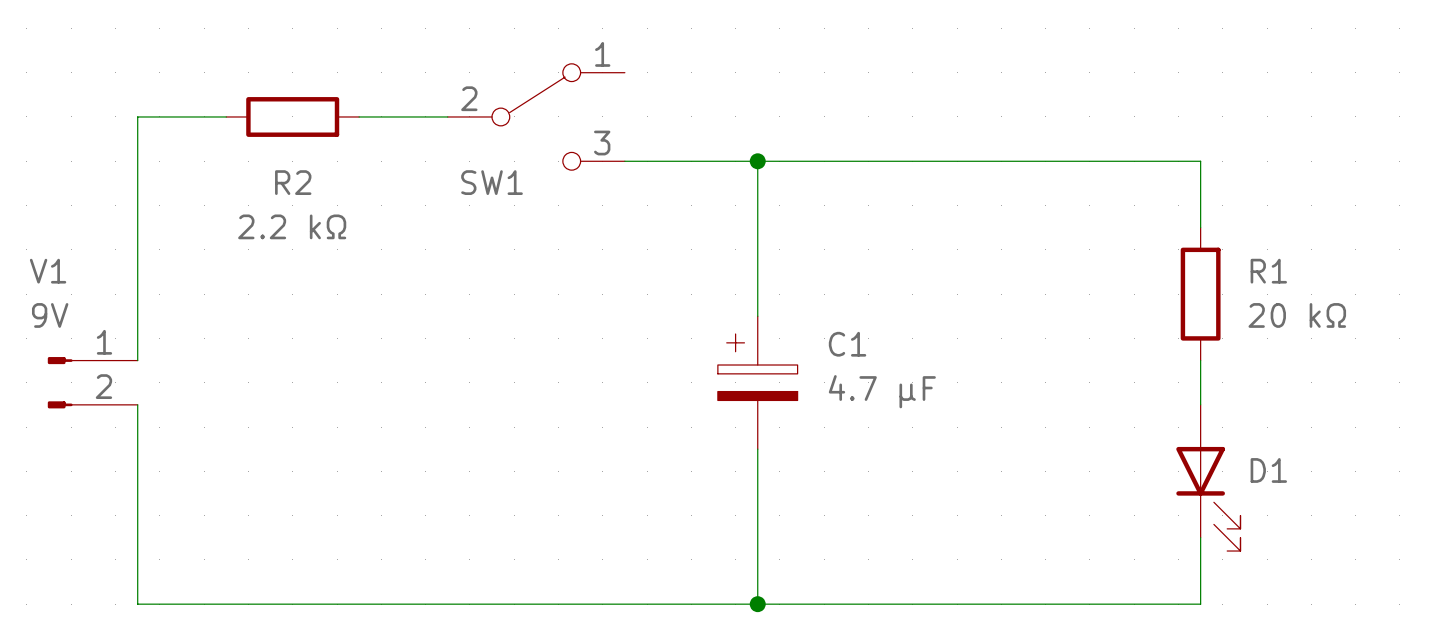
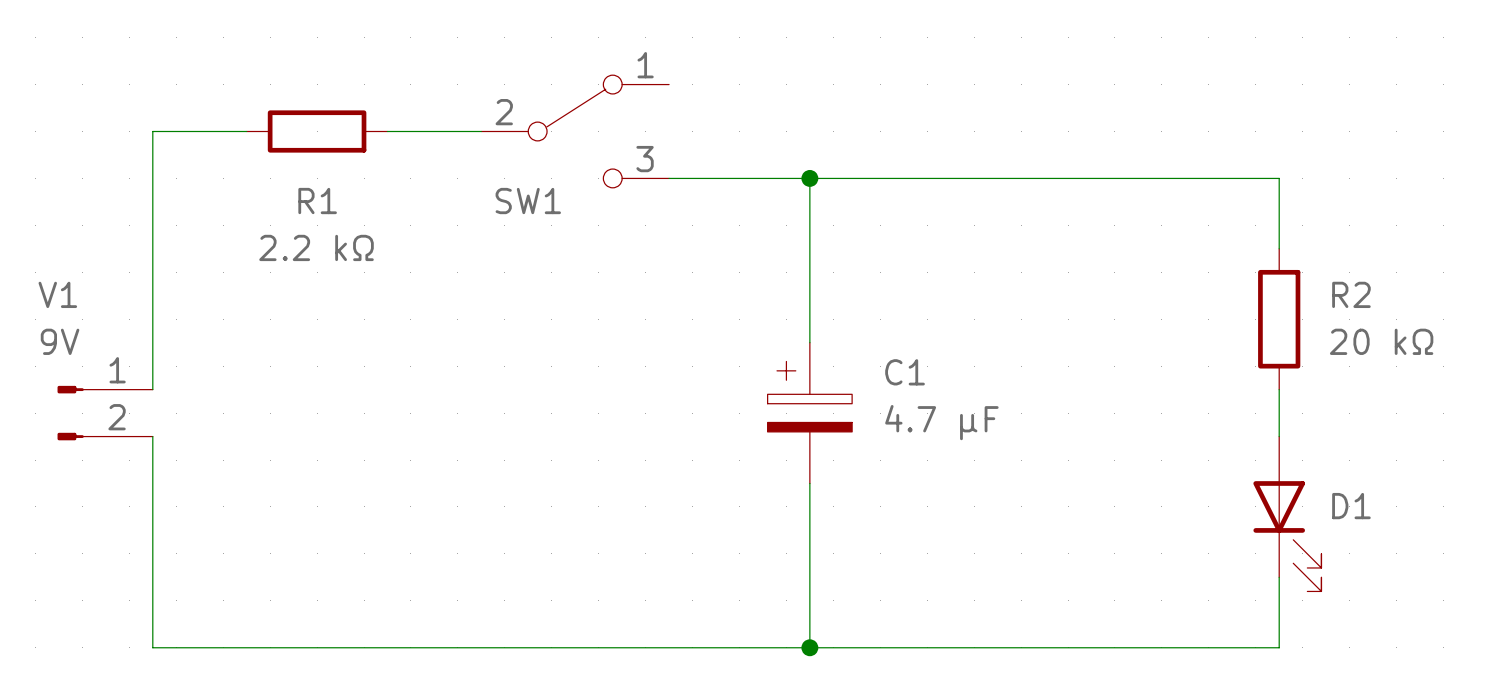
R2 name: R2 (293, 182) -> R1 (317, 201)
R1 name: R1 (1268, 271) -> R2 (1351, 294)

